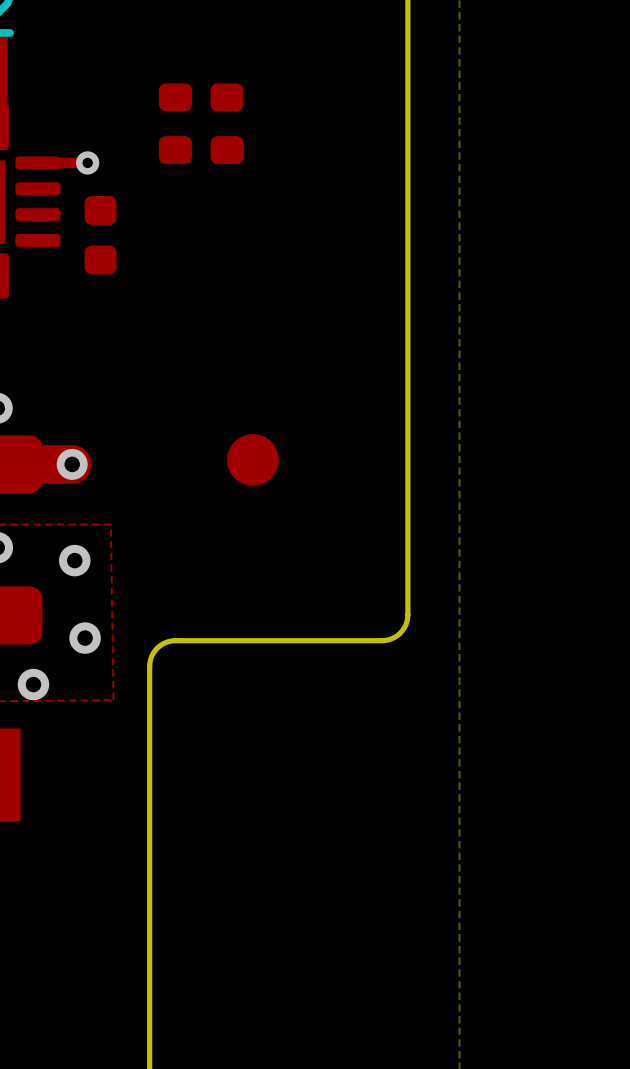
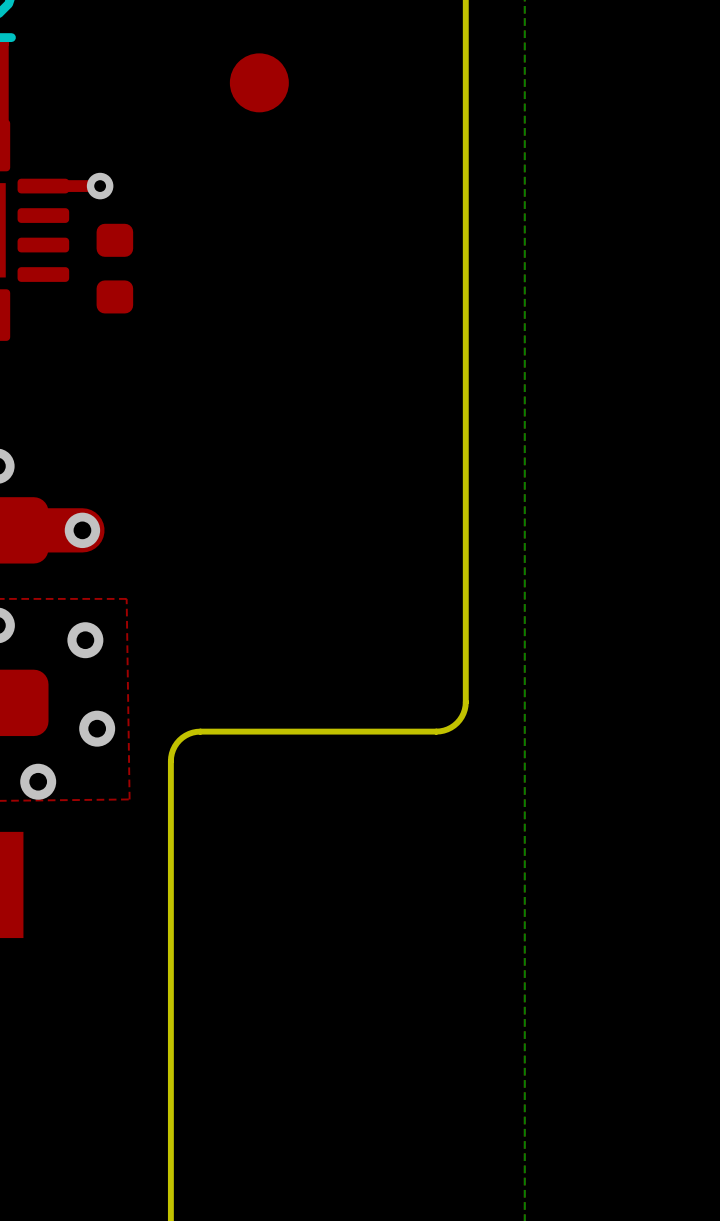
part: (175, 123) -> none
part: (227, 123) -> none
part position: (252, 459) -> (259, 82)

